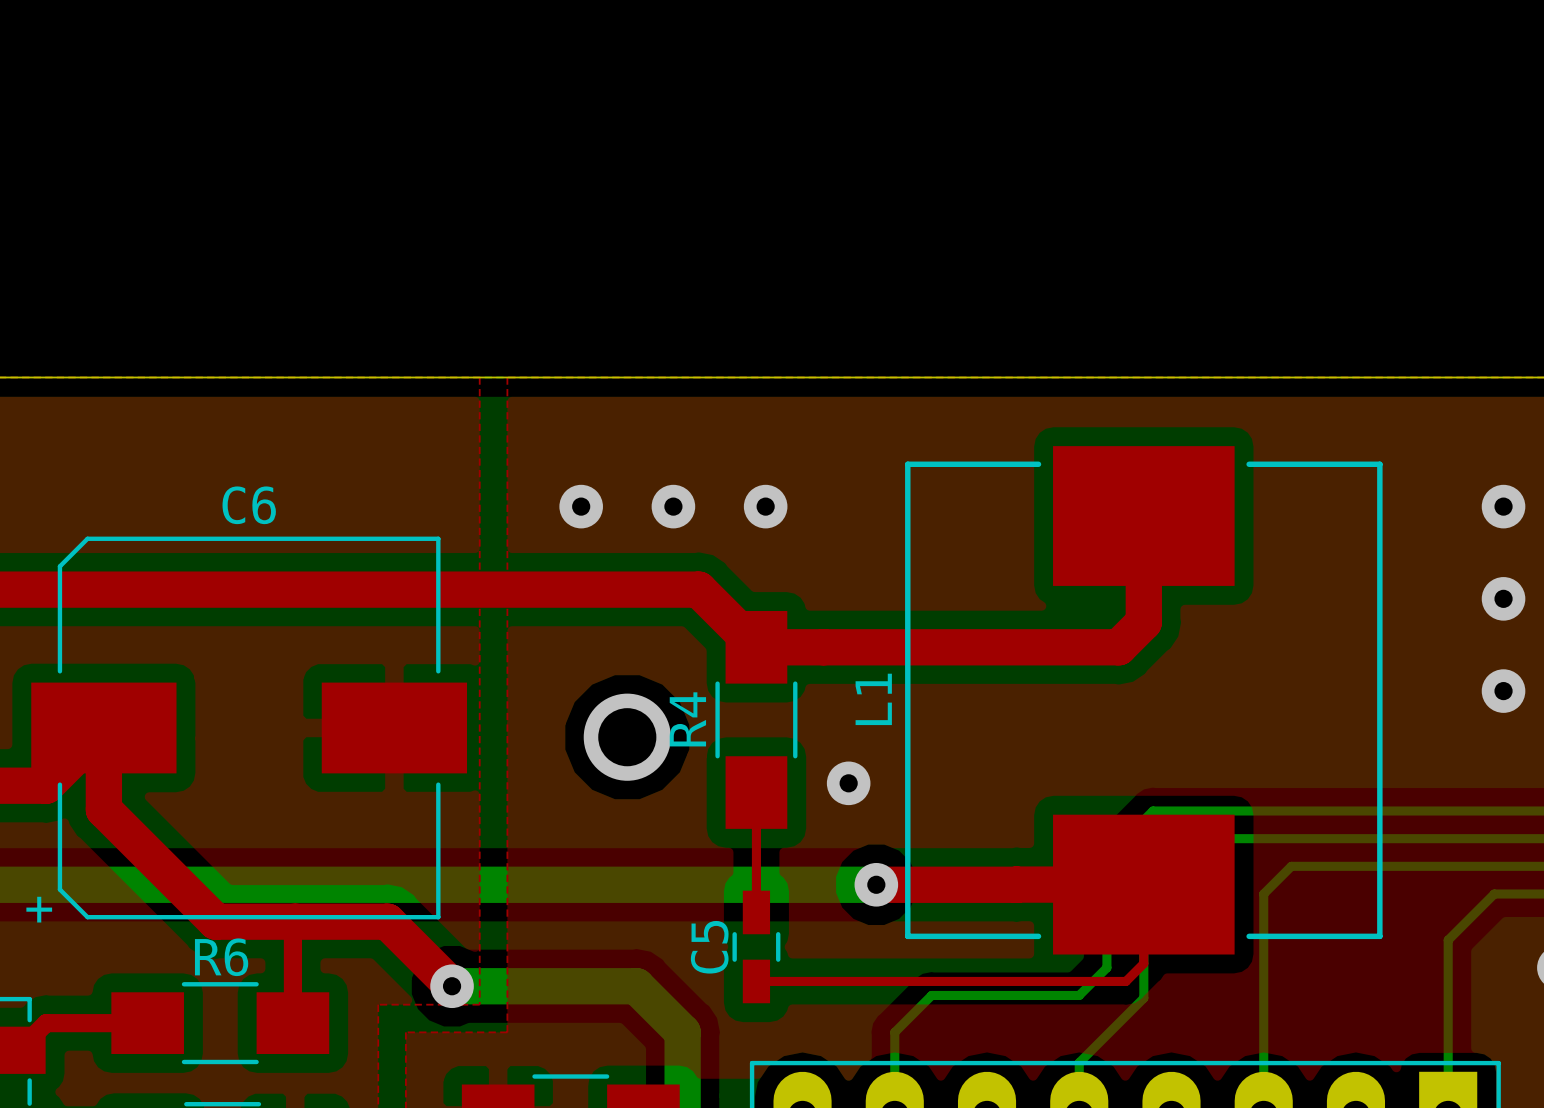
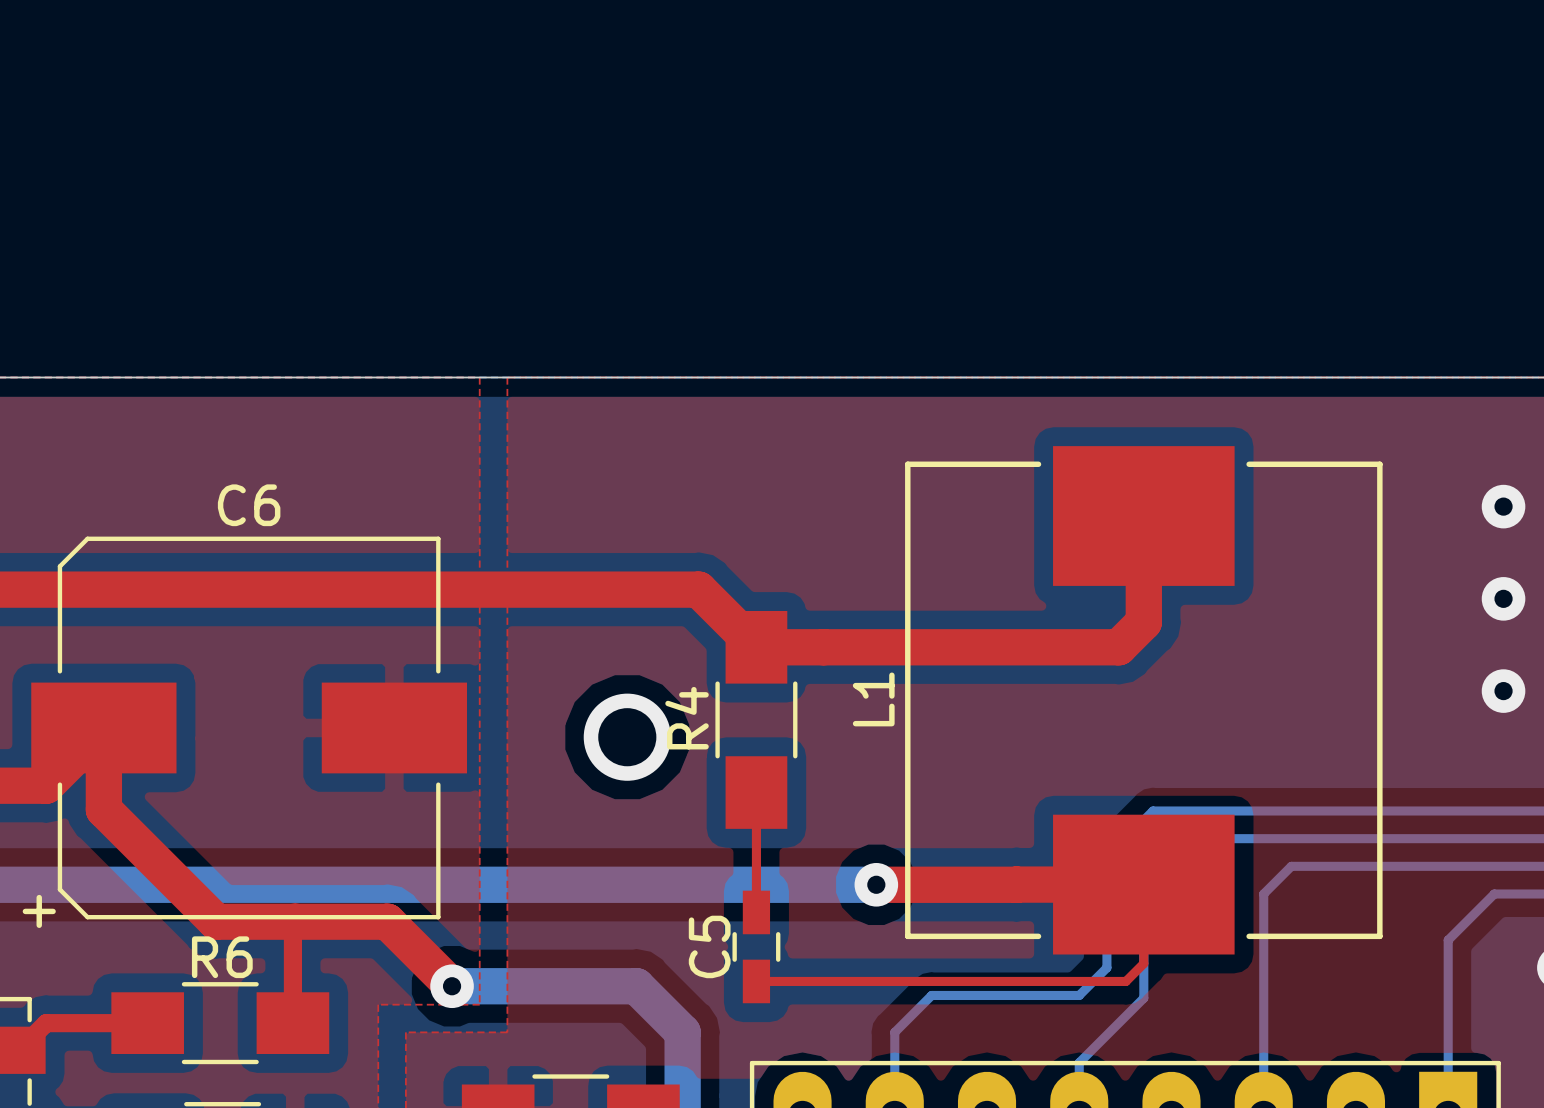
via: (581, 506) -> none
via: (673, 506) -> none
via: (765, 506) -> none
via: (848, 783) -> none

